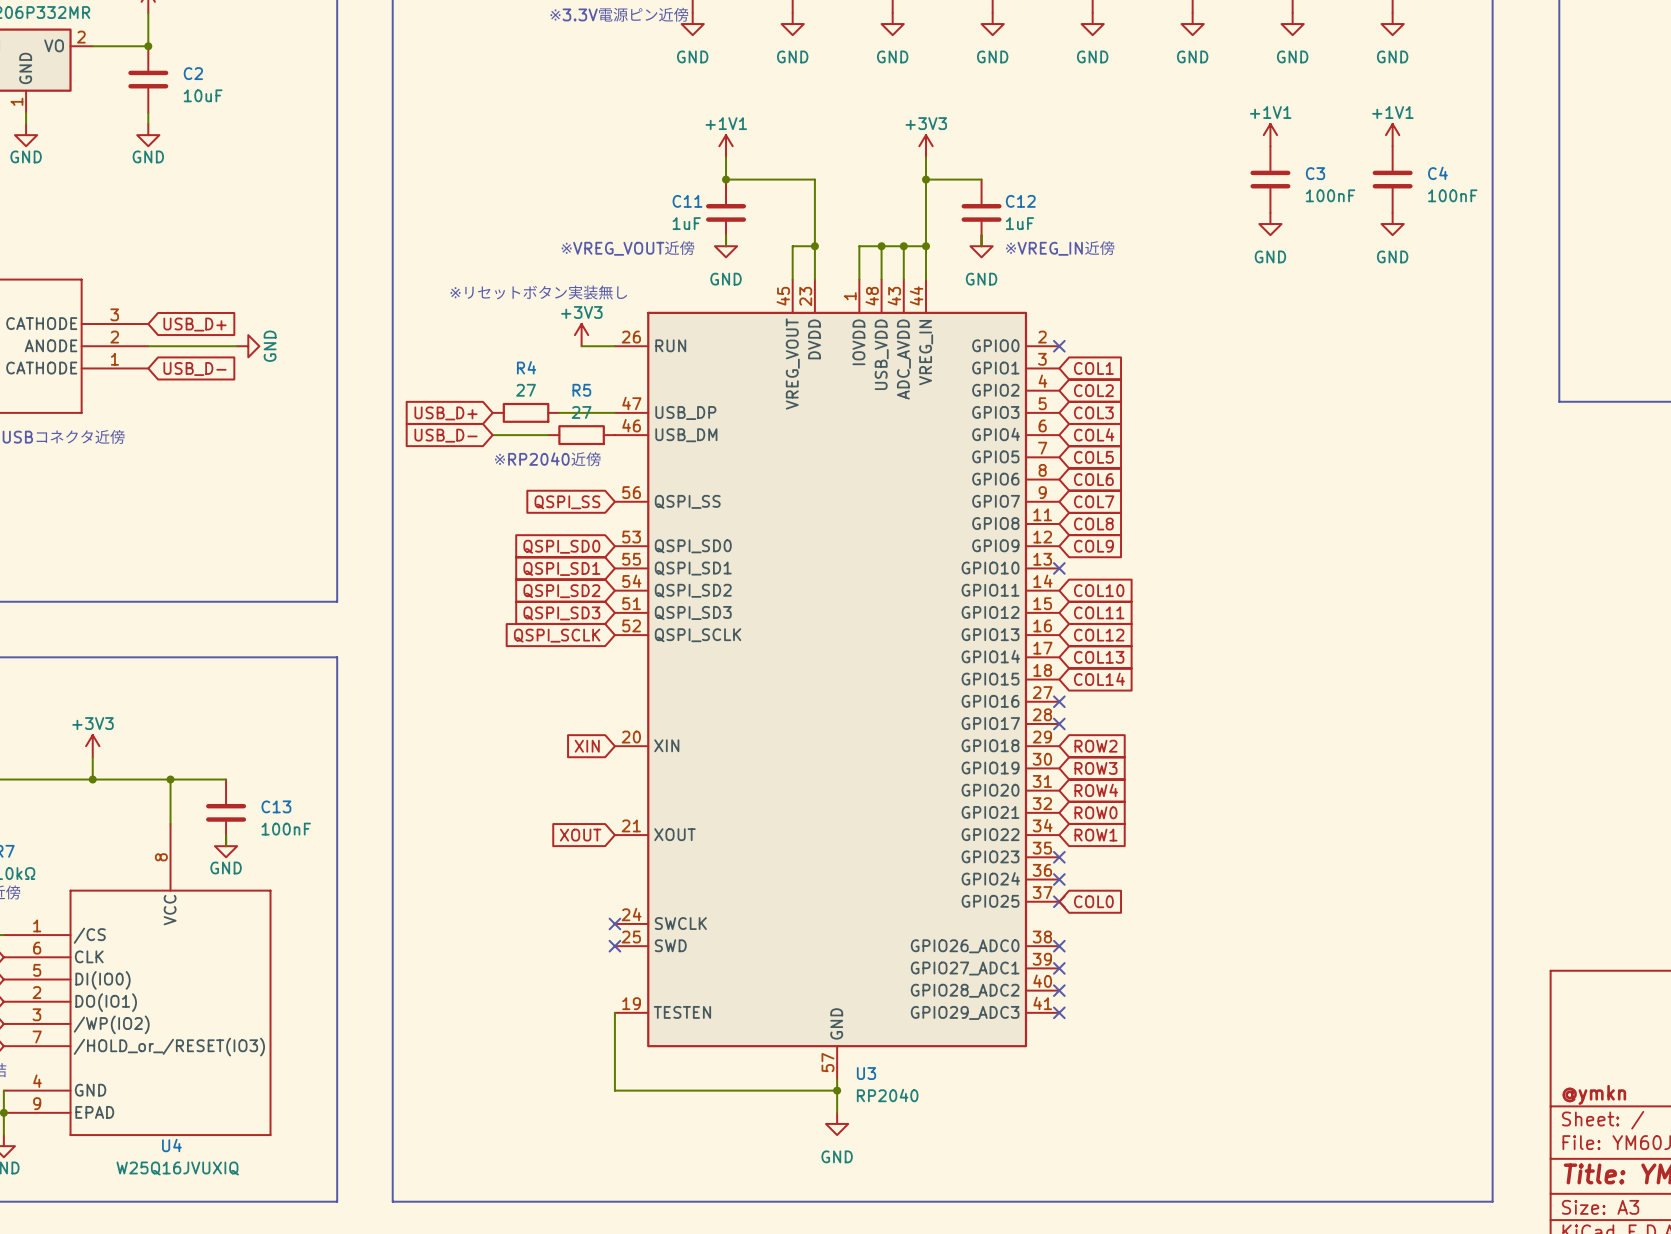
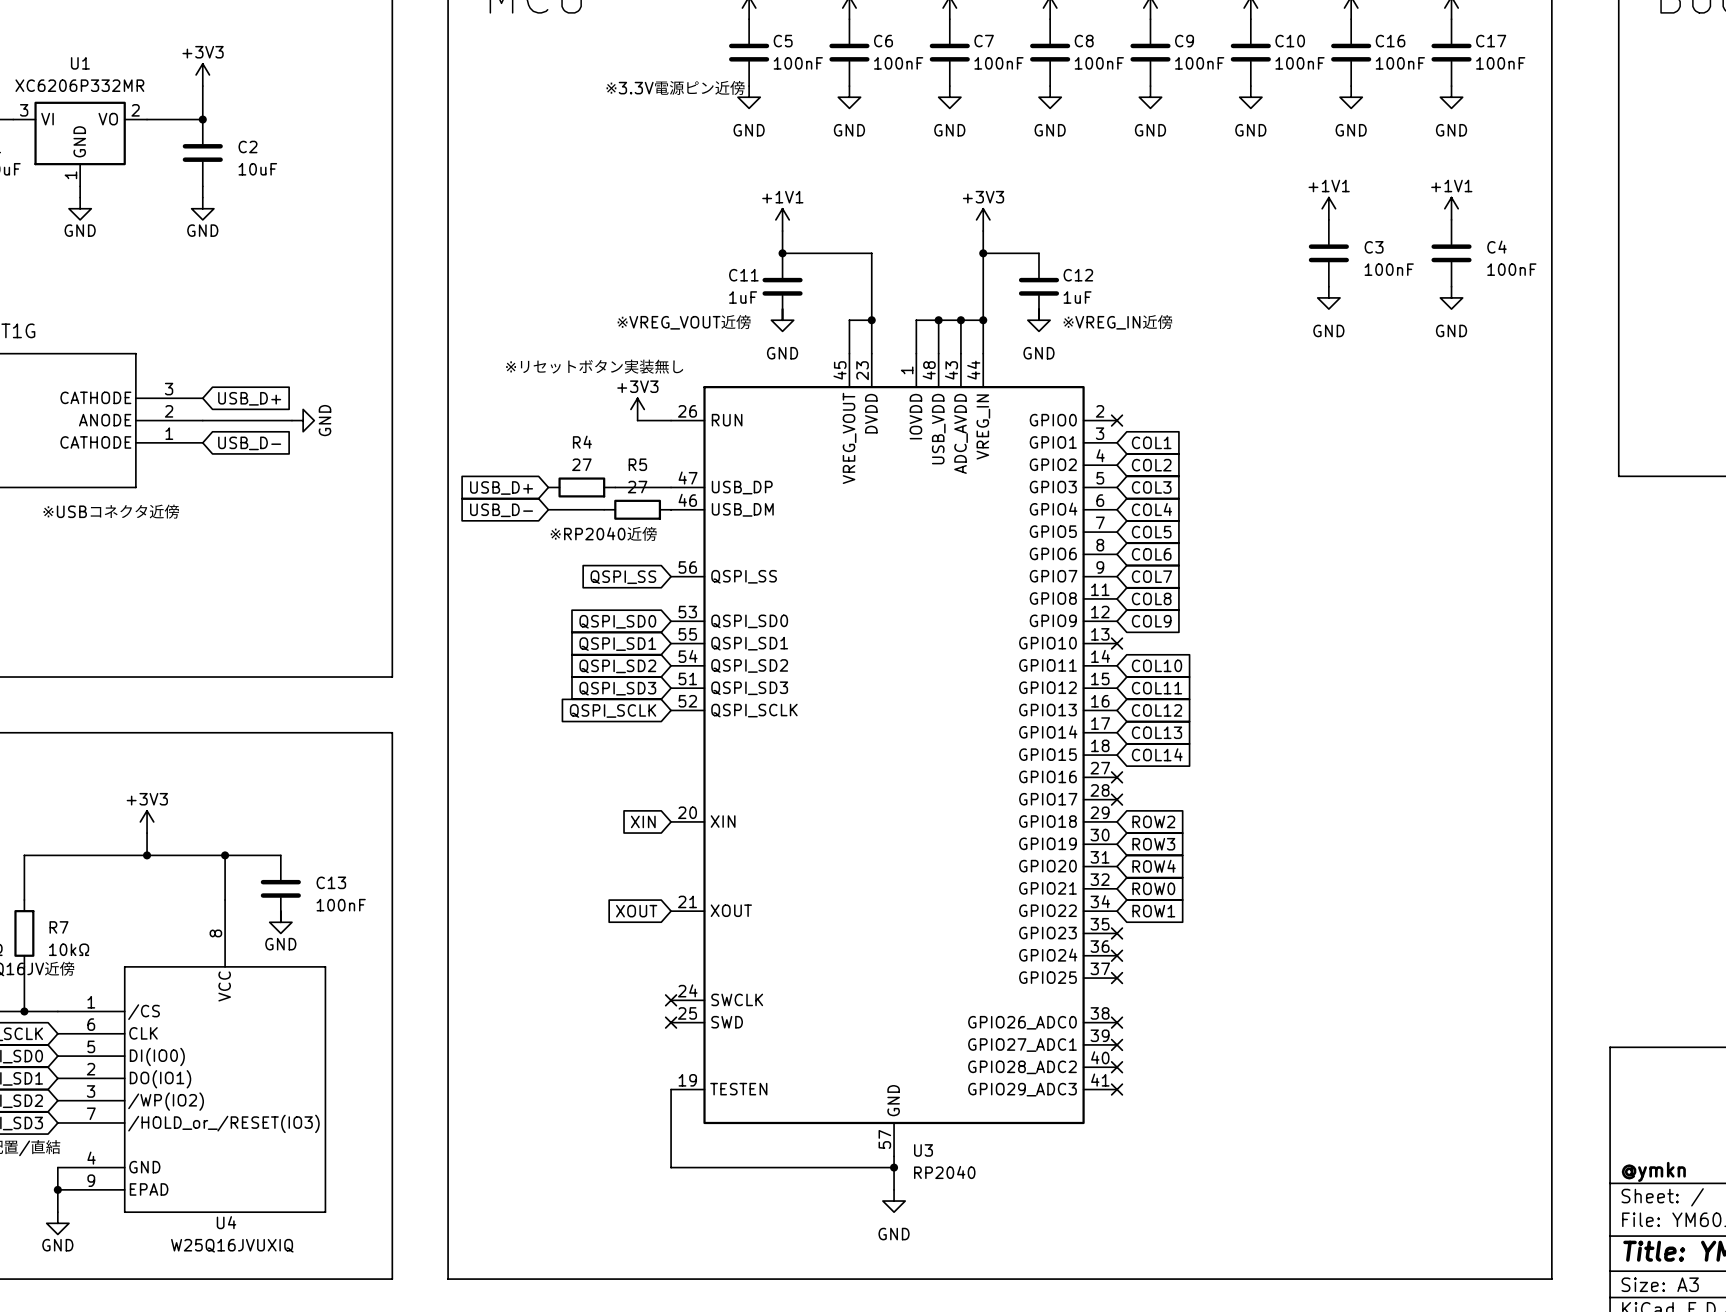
global label: COL0 (1093, 901) -> none

